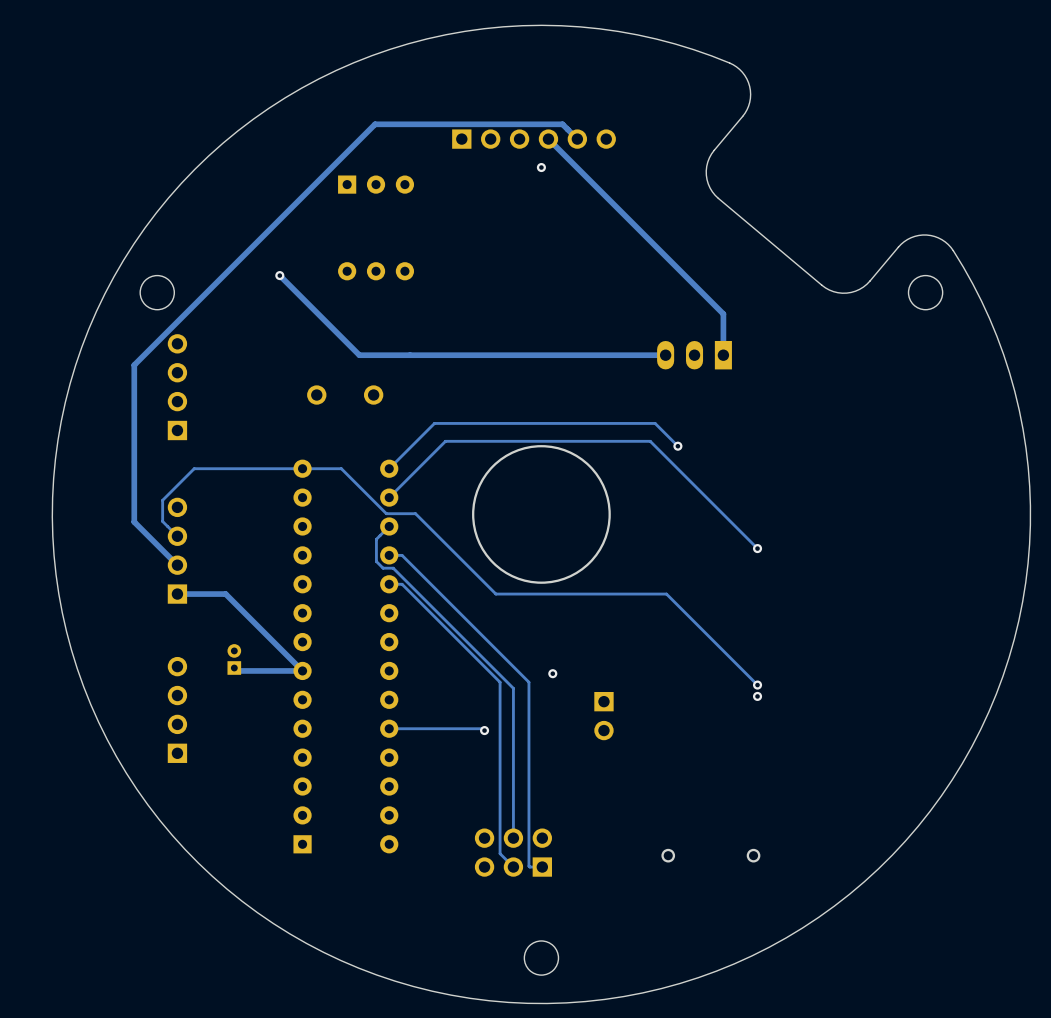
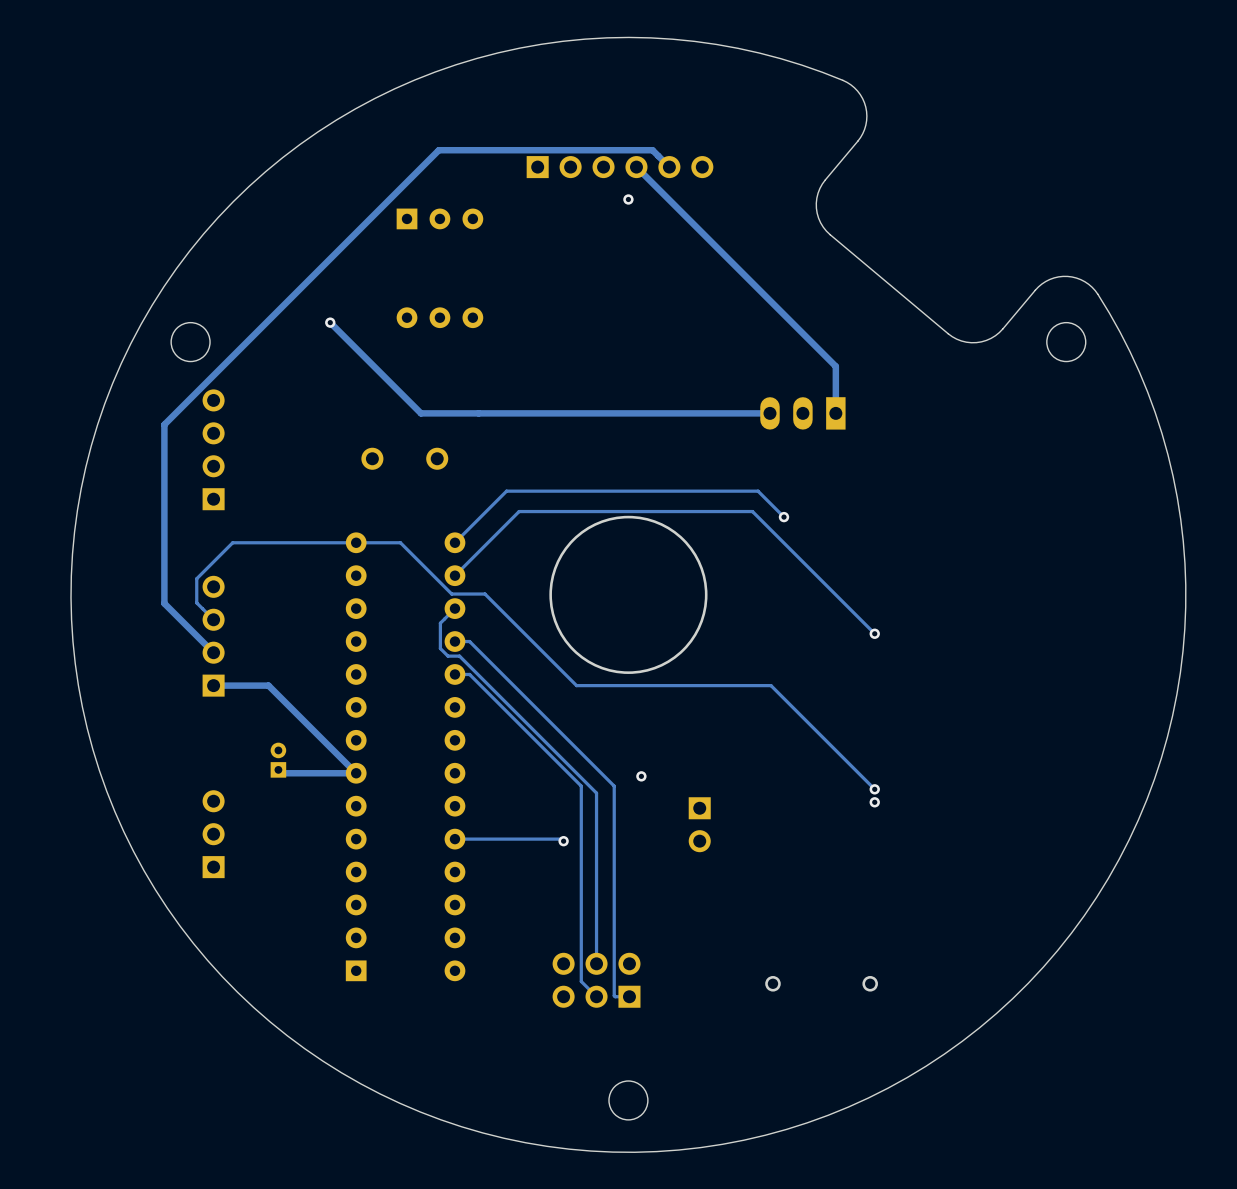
part: (177, 709) -> none

